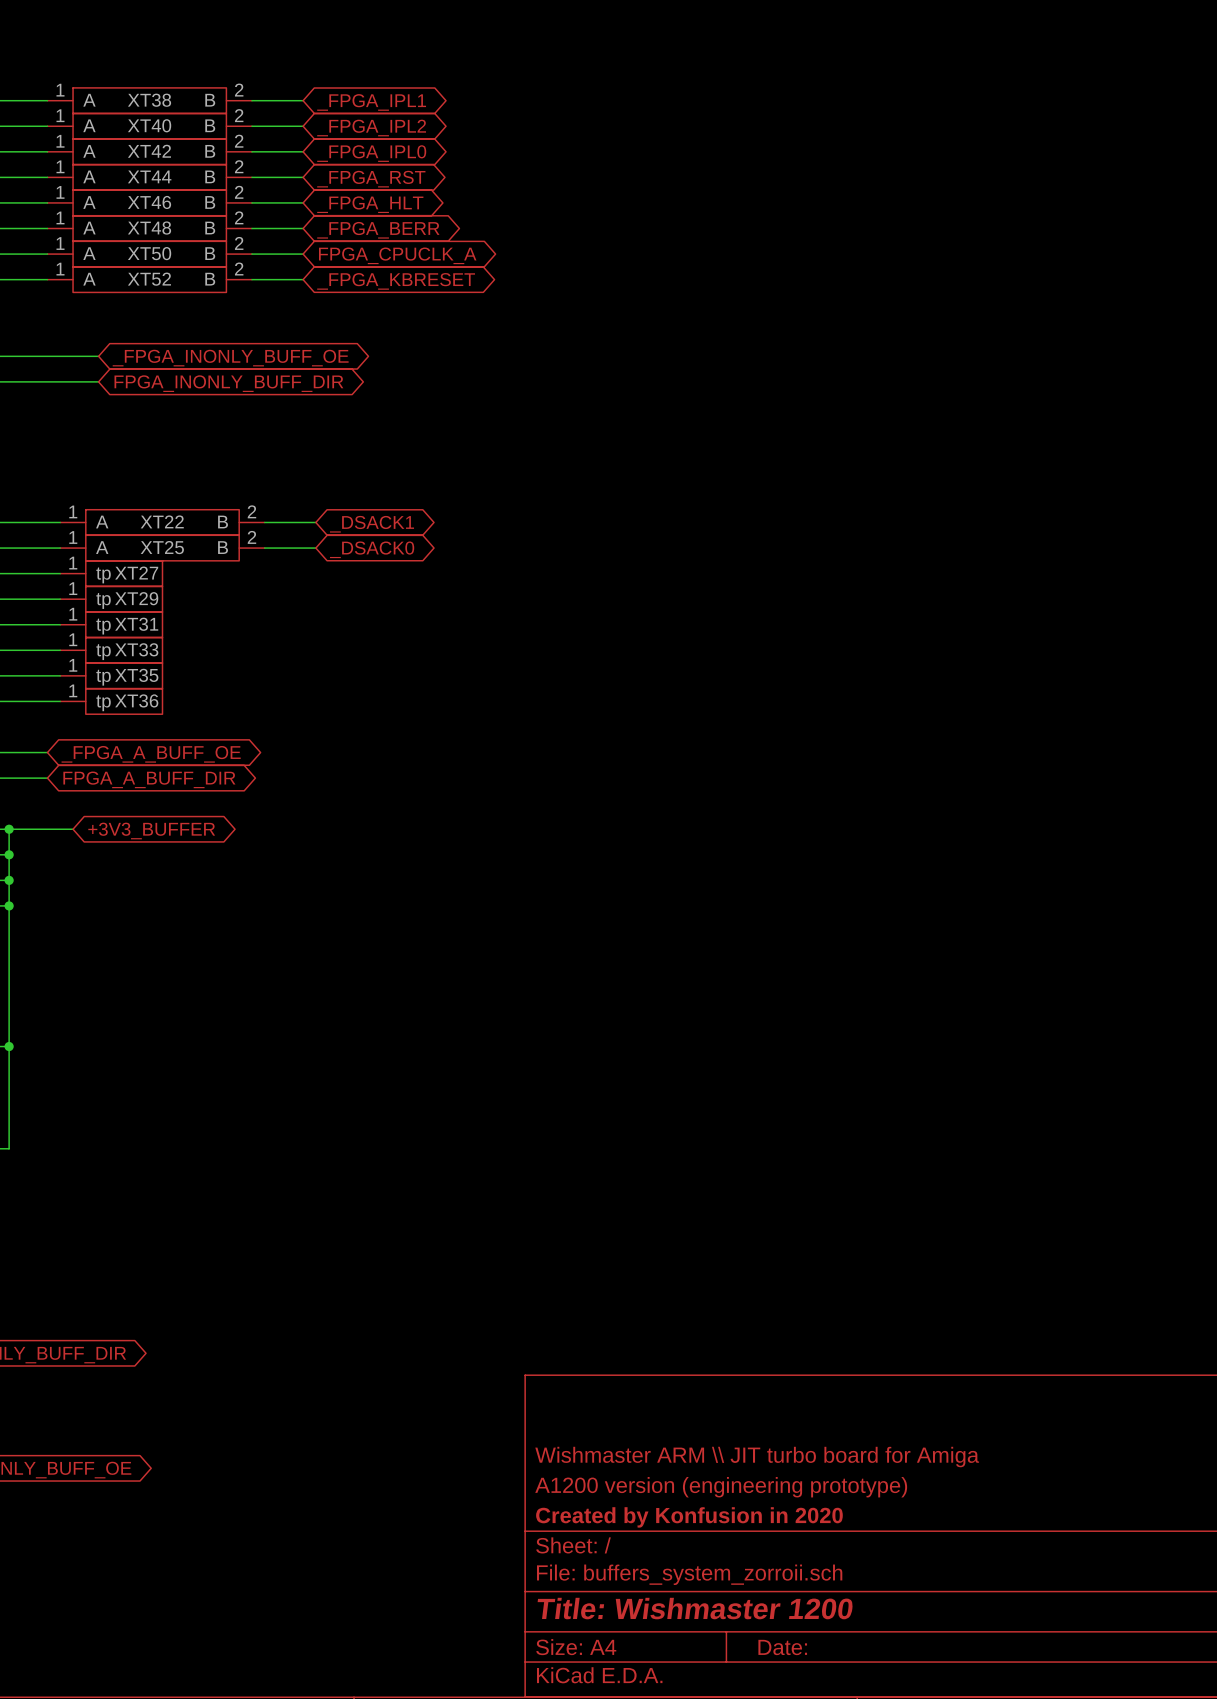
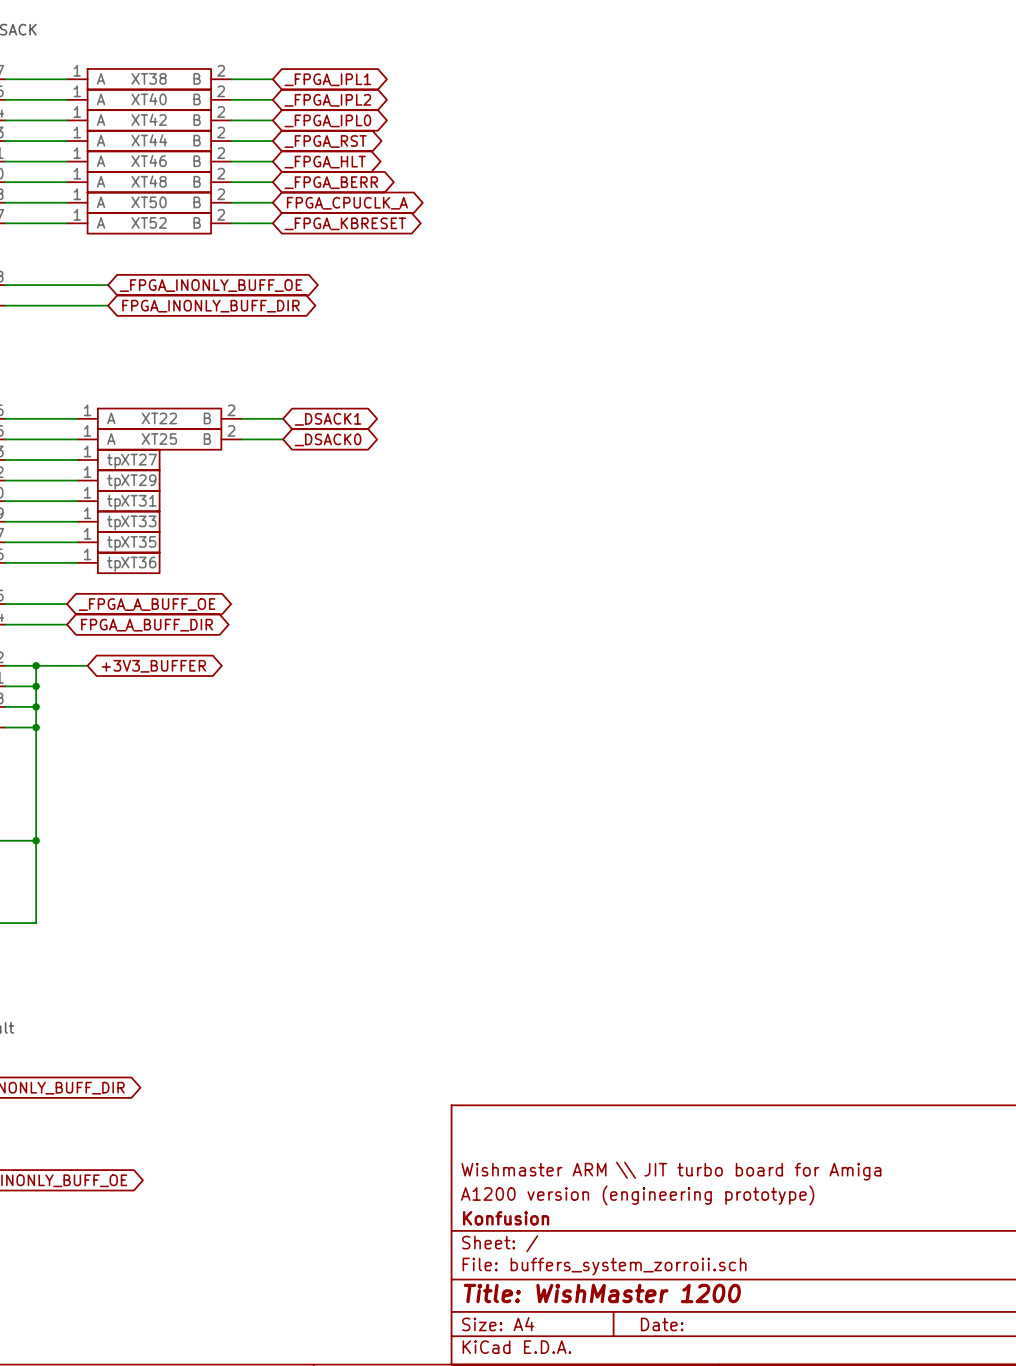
title block: Created by Konfusion in 2020 (689, 1517) -> Konfusion (506, 1218)
title block: Title: Wishmaster 1200 (695, 1608) -> Title: WishMaster 1200 (602, 1293)

